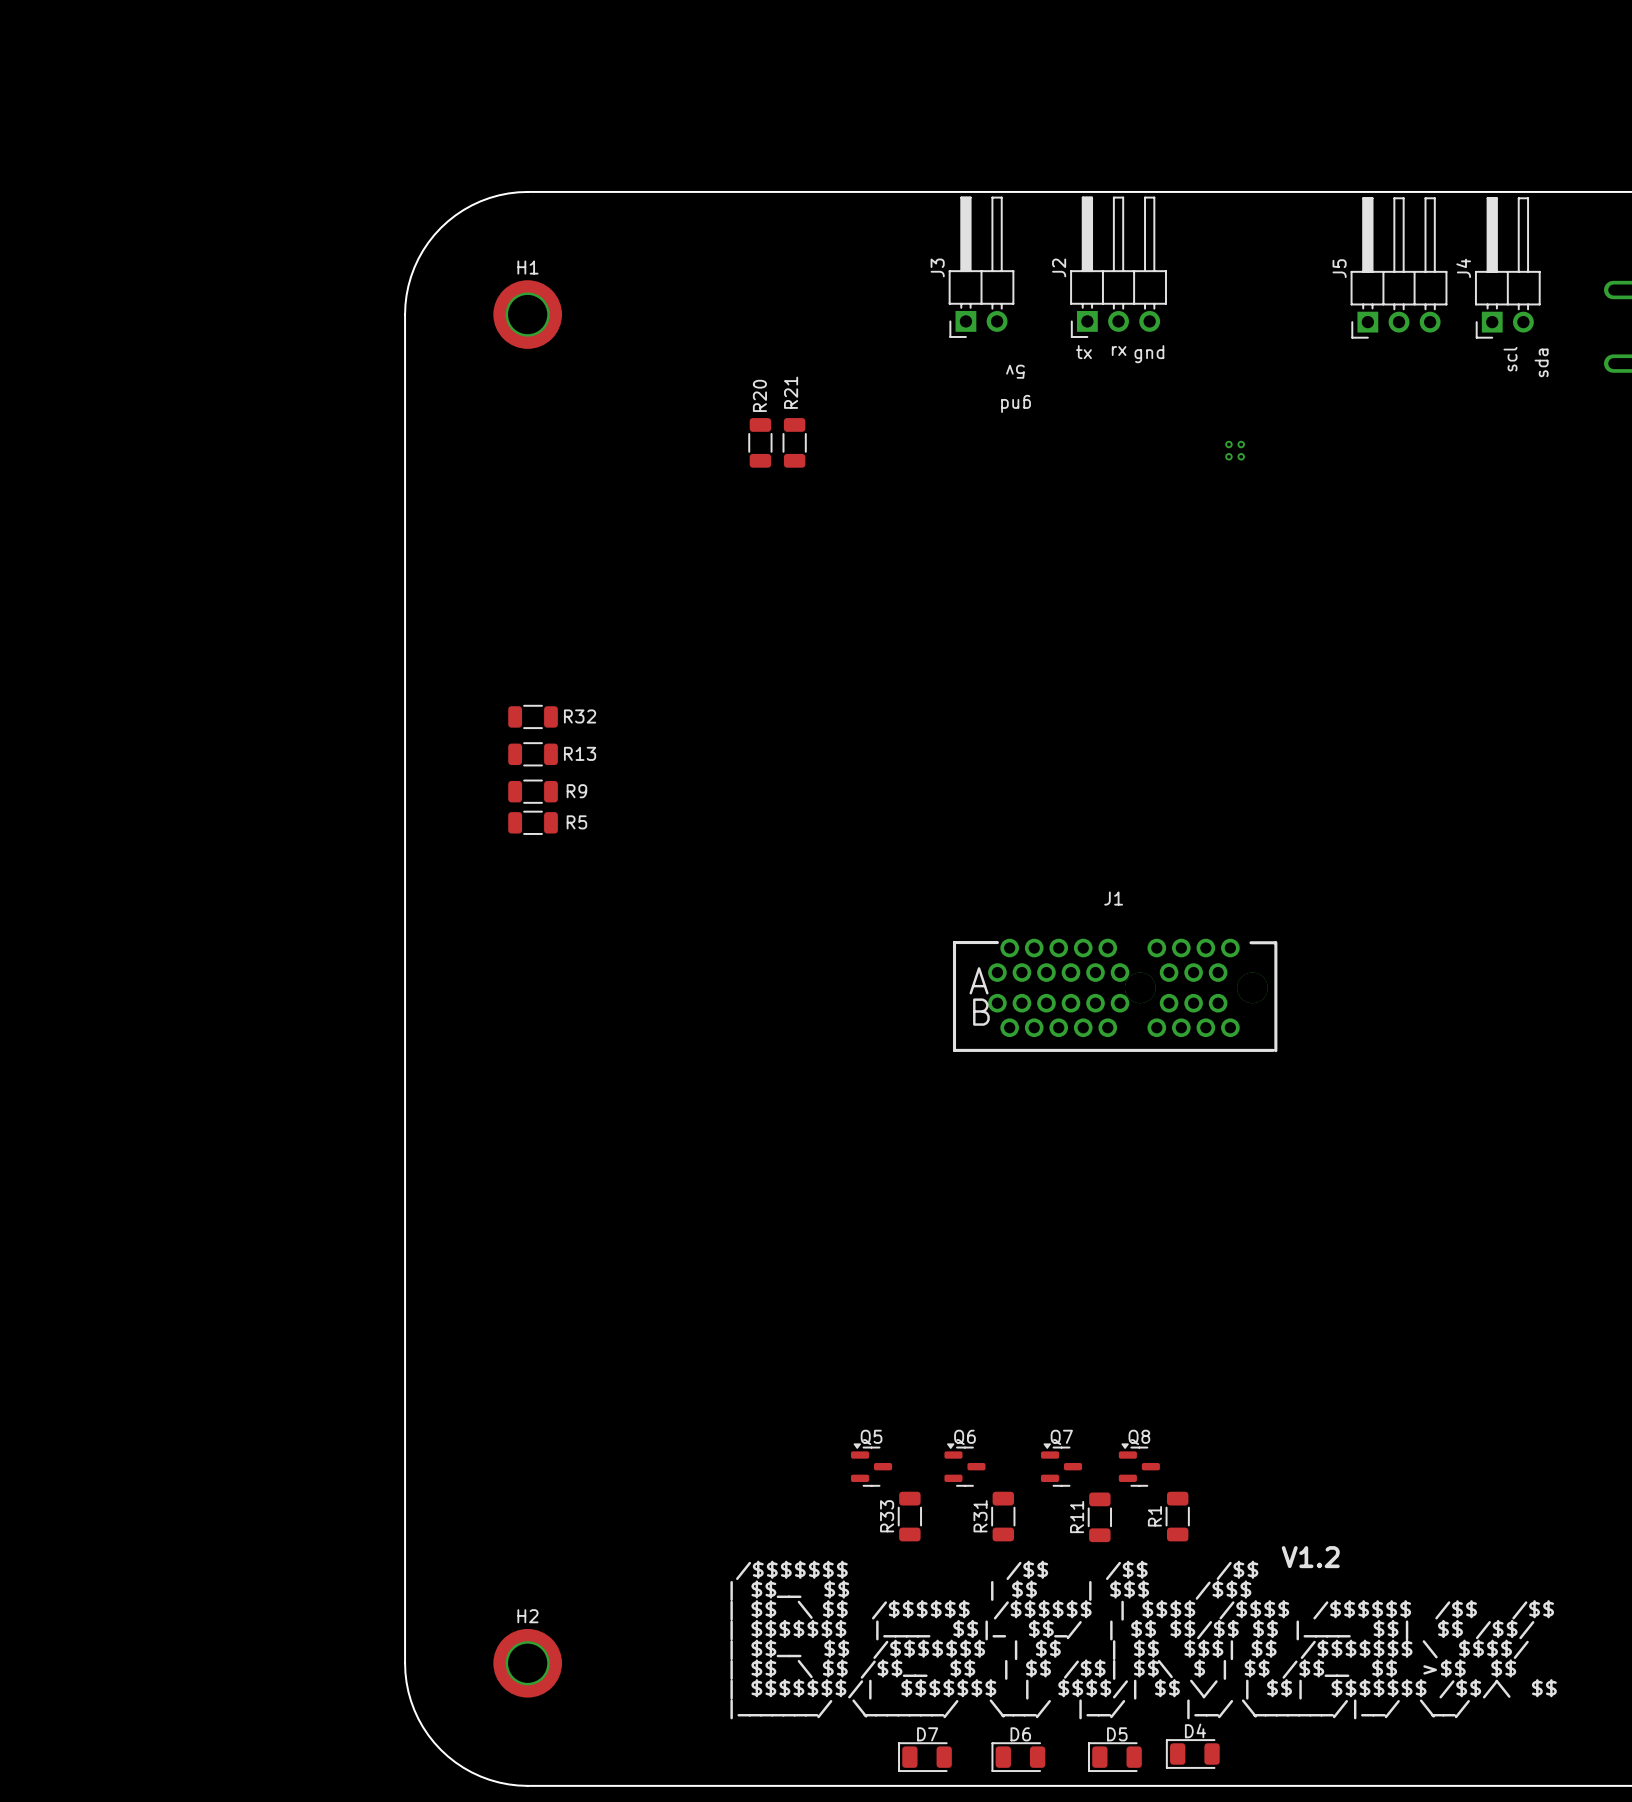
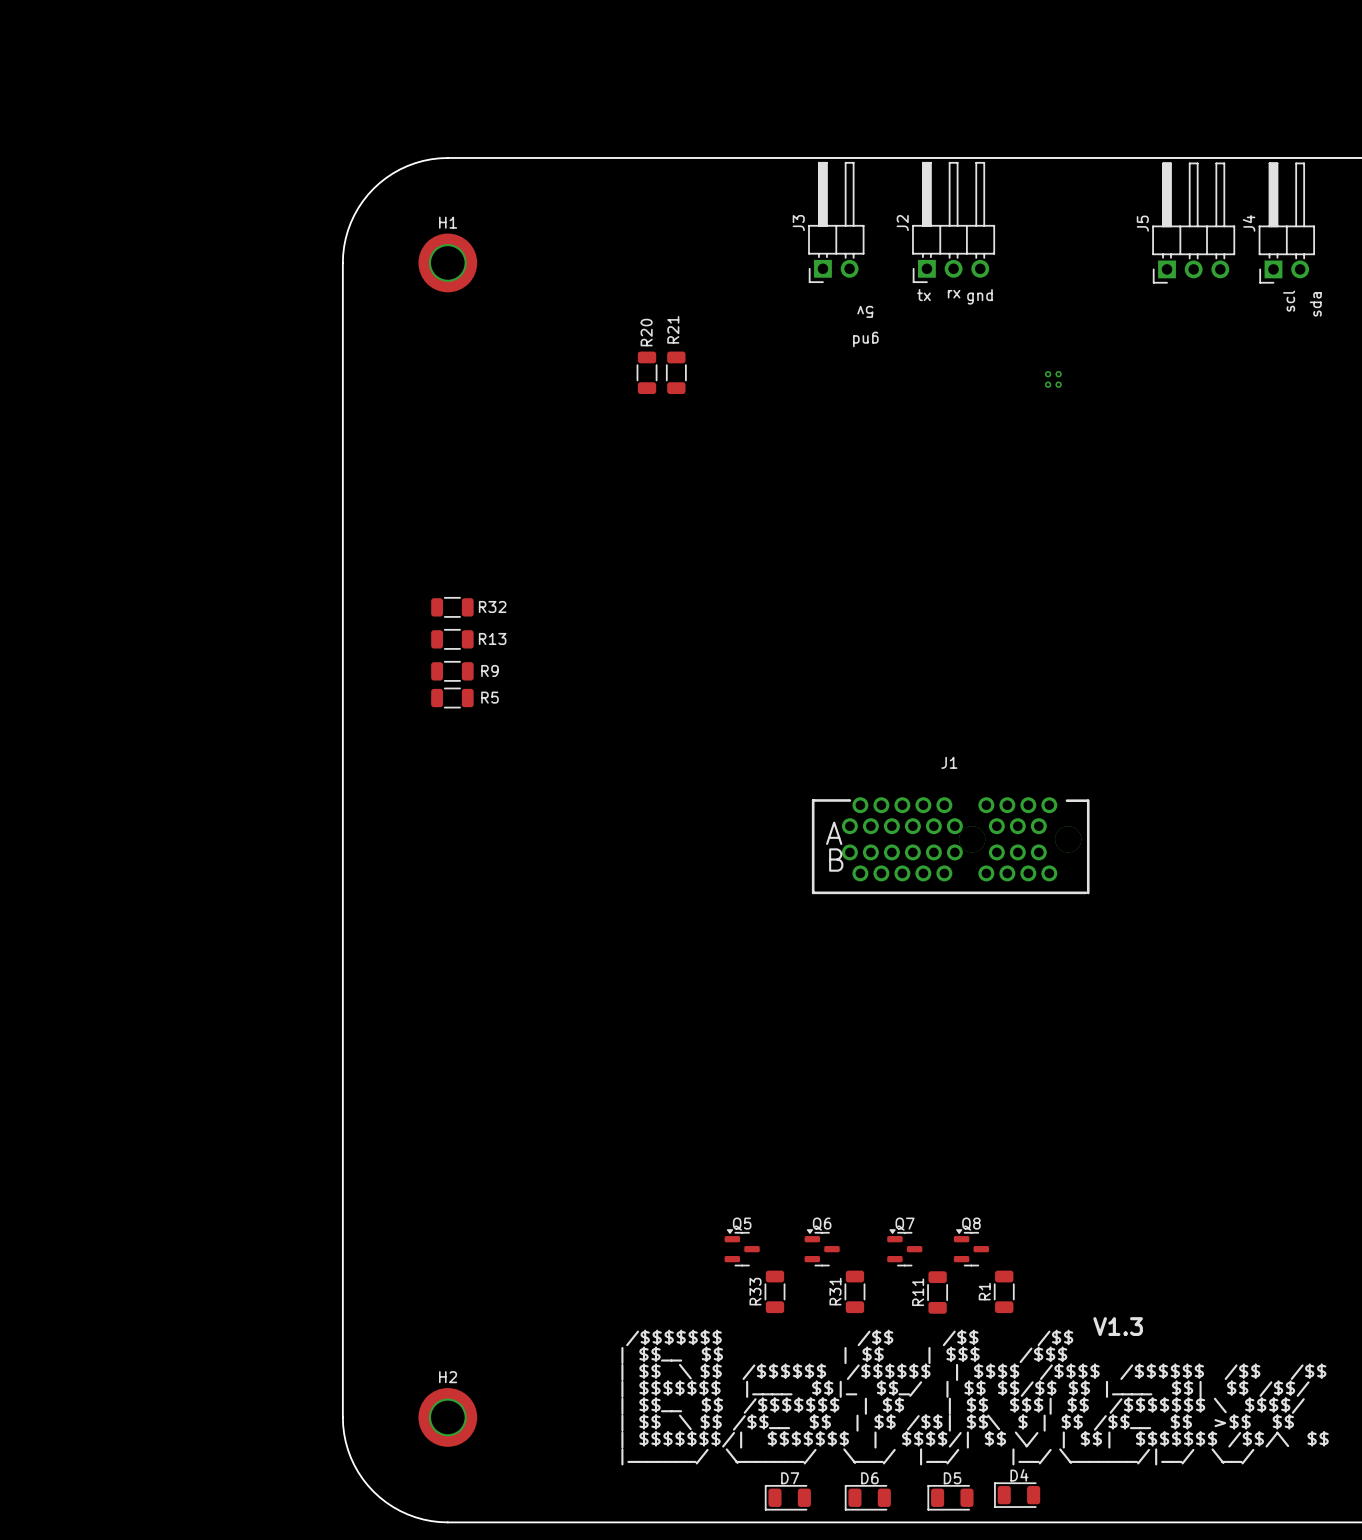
text: V1.2 (1310, 1557) -> V1.3 (1118, 1326)

